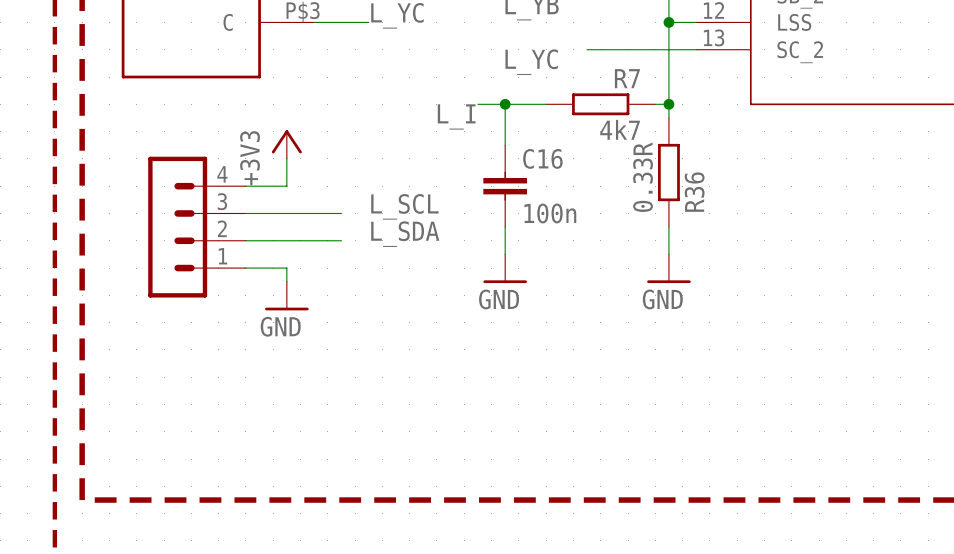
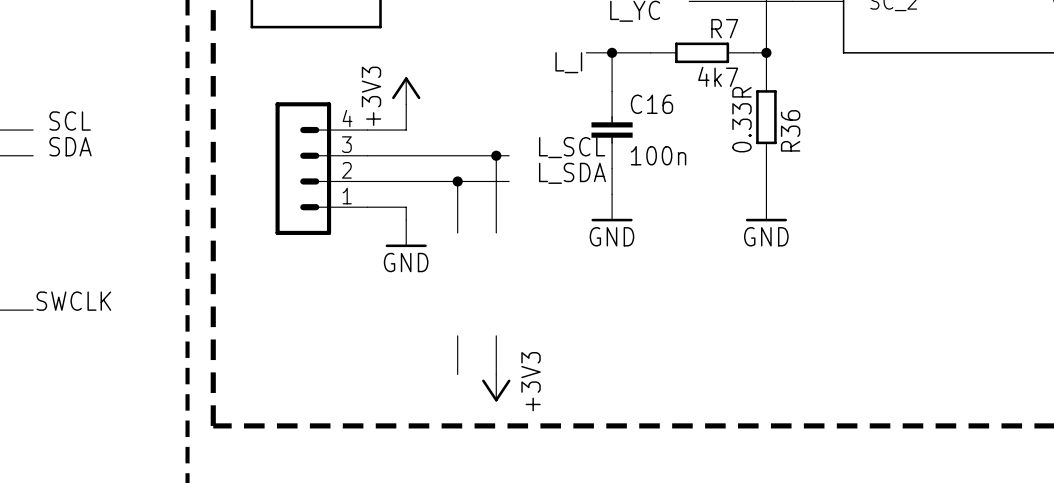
label position: L_SCL (404, 206) -> L_SCL (572, 147)
wire: none -> (457, 155) (509, 155)
wire: none -> (496, 155) (496, 232)
junction: none -> (496, 155)
label position: L_SDA (405, 234) -> L_SDA (572, 173)
junction: none -> (457, 181)
wire: none -> (509, 181) (457, 181) (457, 232)
wire: none -> (457, 335) (457, 374)
wire: none -> (496, 335) (496, 374)
power symbol: none -> +3V3 (496, 387)

